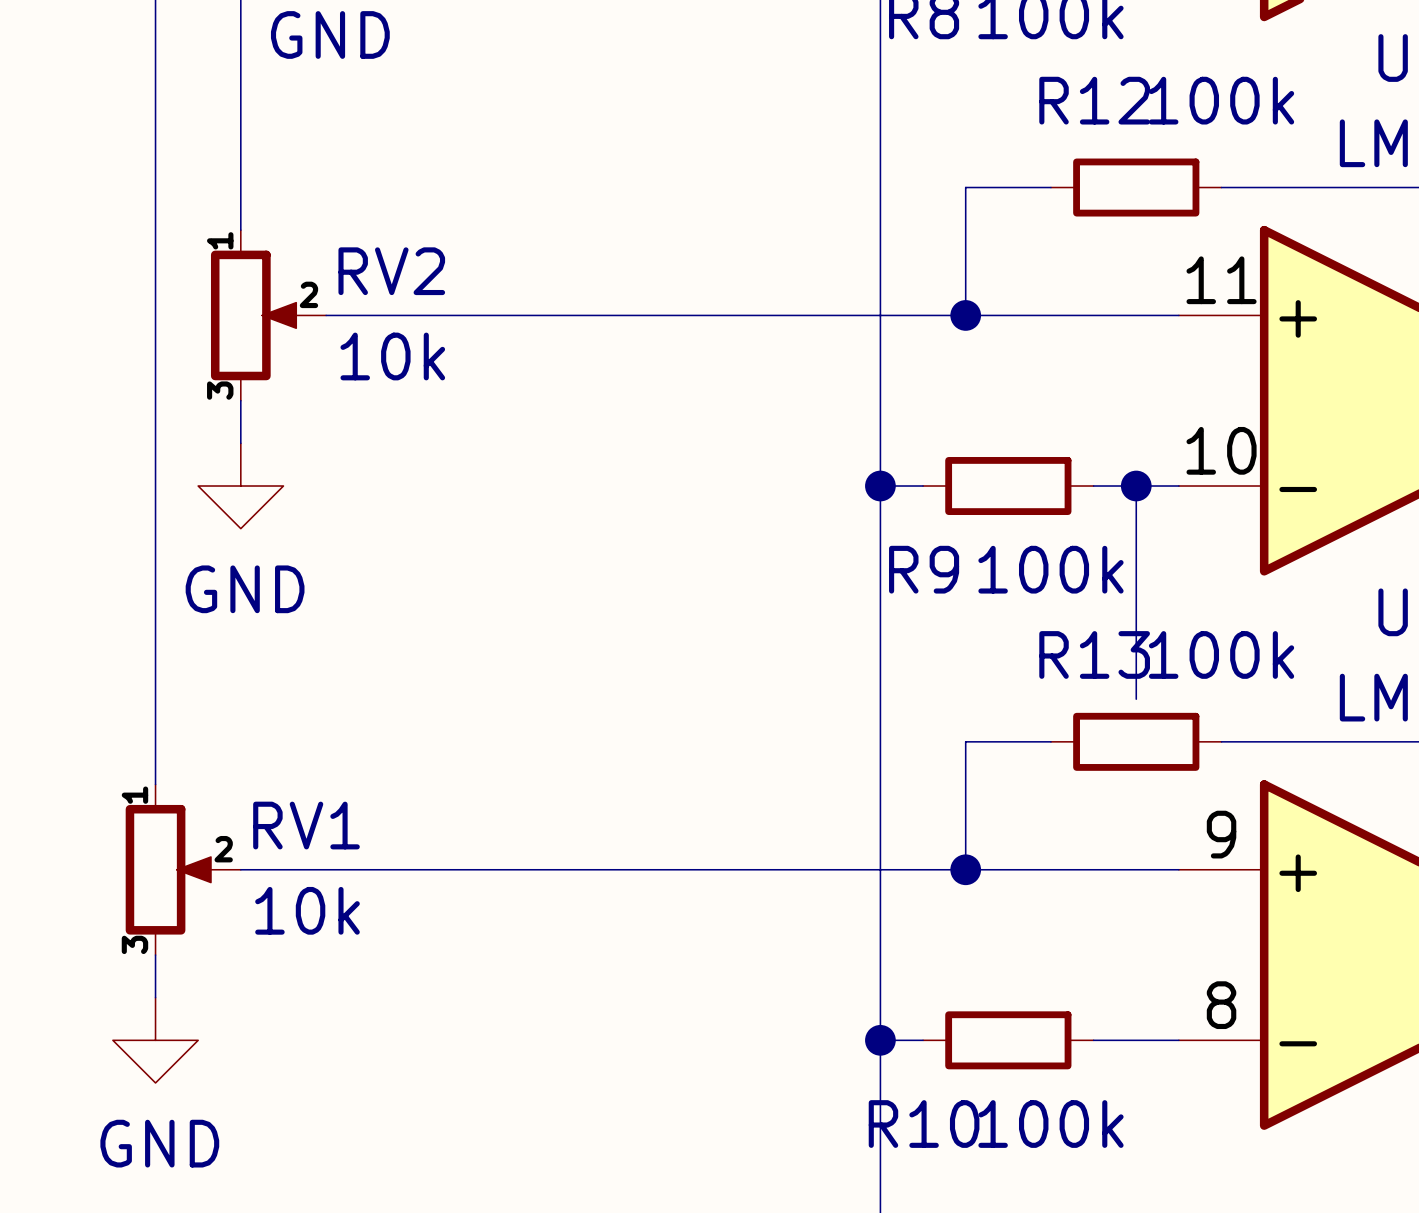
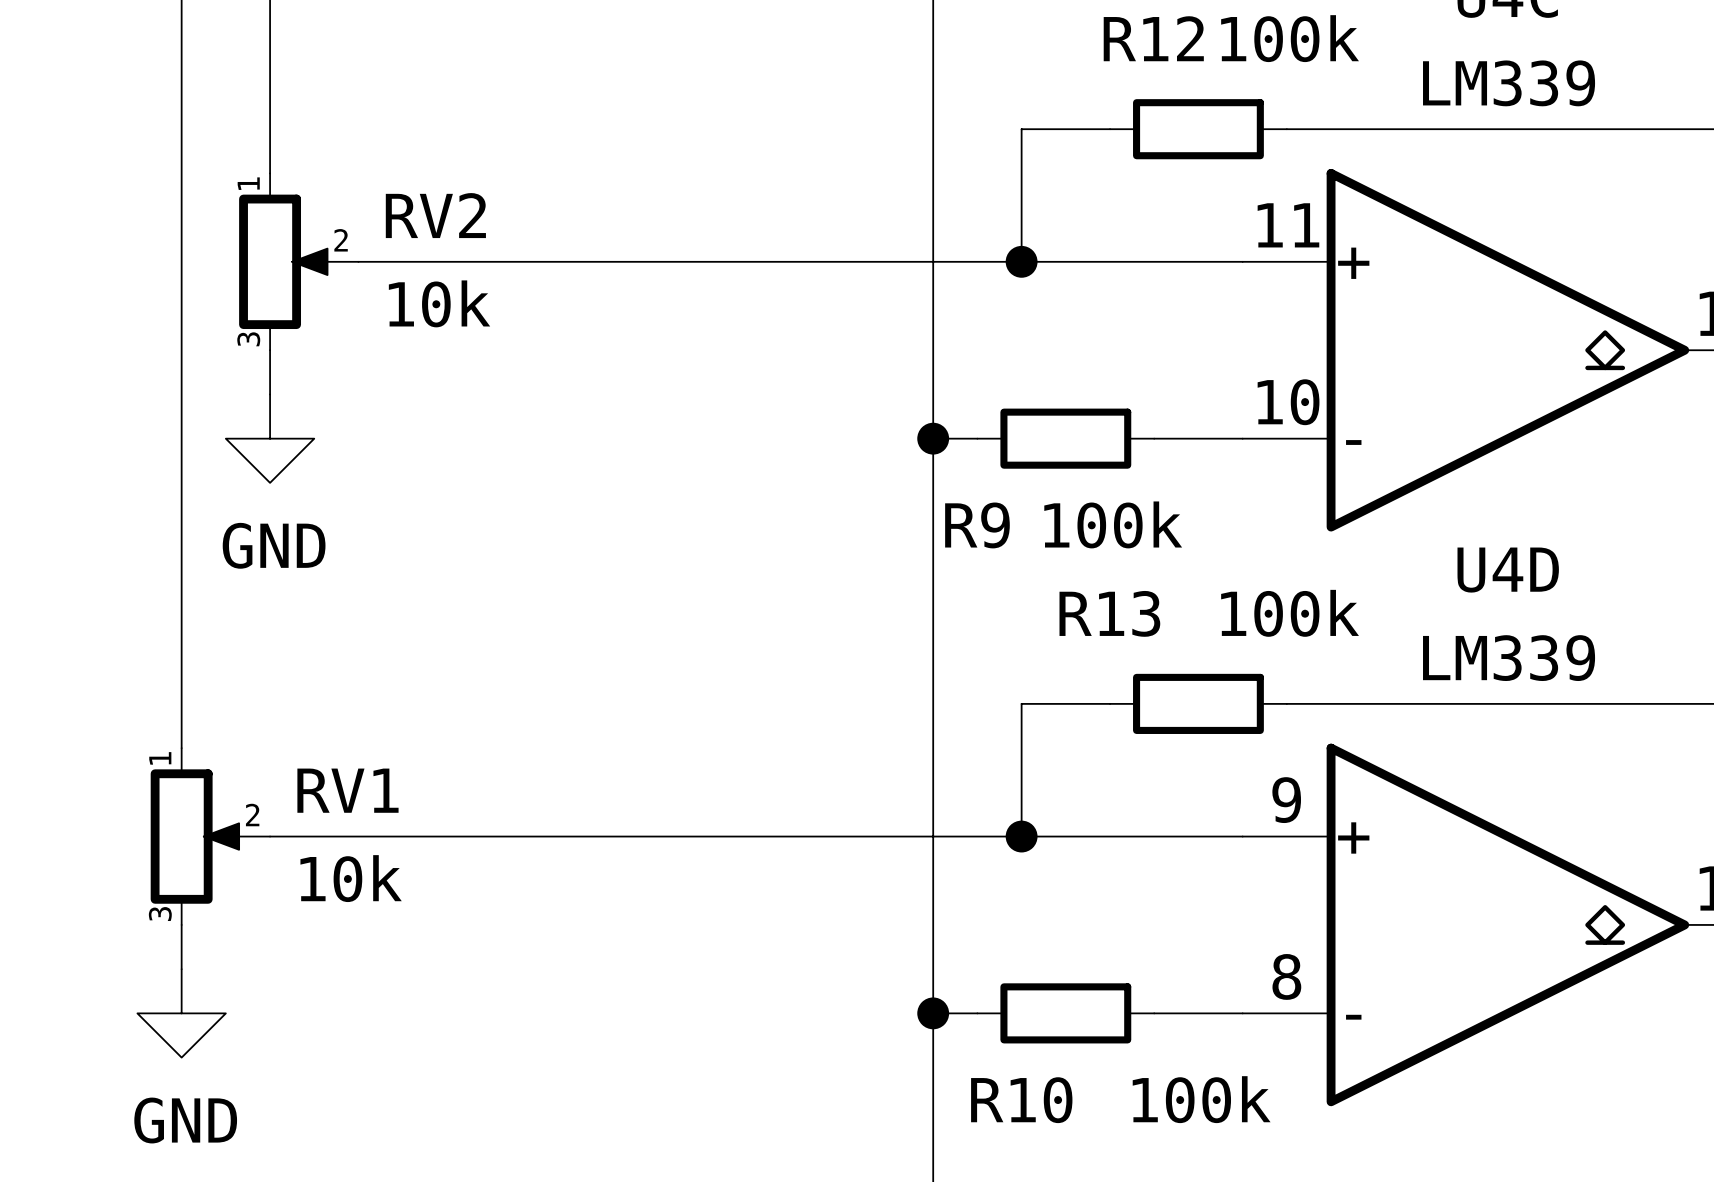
wire: (1136, 486) (1136, 699) -> none
junction: (1136, 486) -> none
R13 name position: R13 (1094, 654) -> R13 (1109, 613)
R10 name position: R10 (924, 1124) -> R10 (1021, 1100)
R10 value position: 100k (1050, 1124) -> 100k (1201, 1099)

